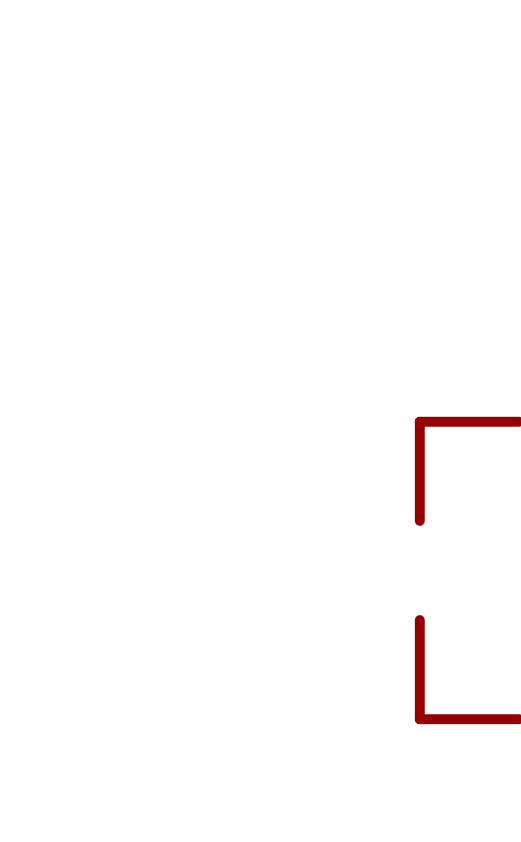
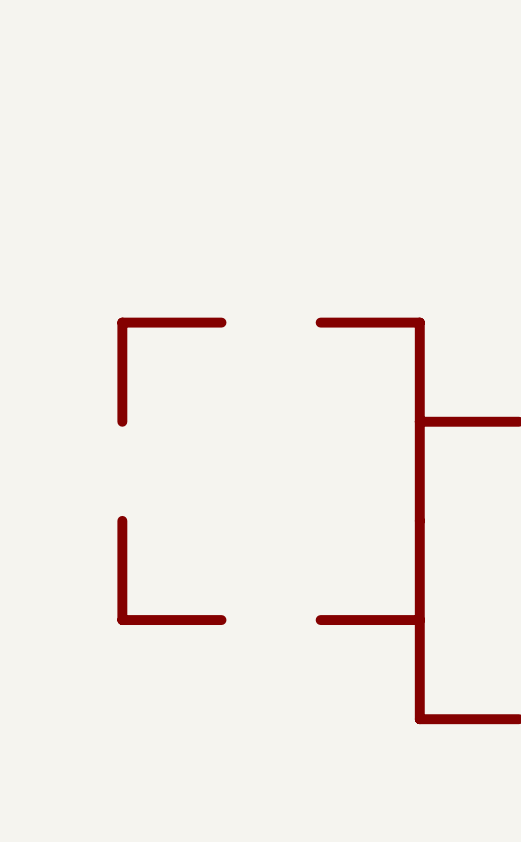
part: none -> (171, 372)
part: none -> (370, 372)
part: none -> (171, 570)
part: none -> (370, 570)

